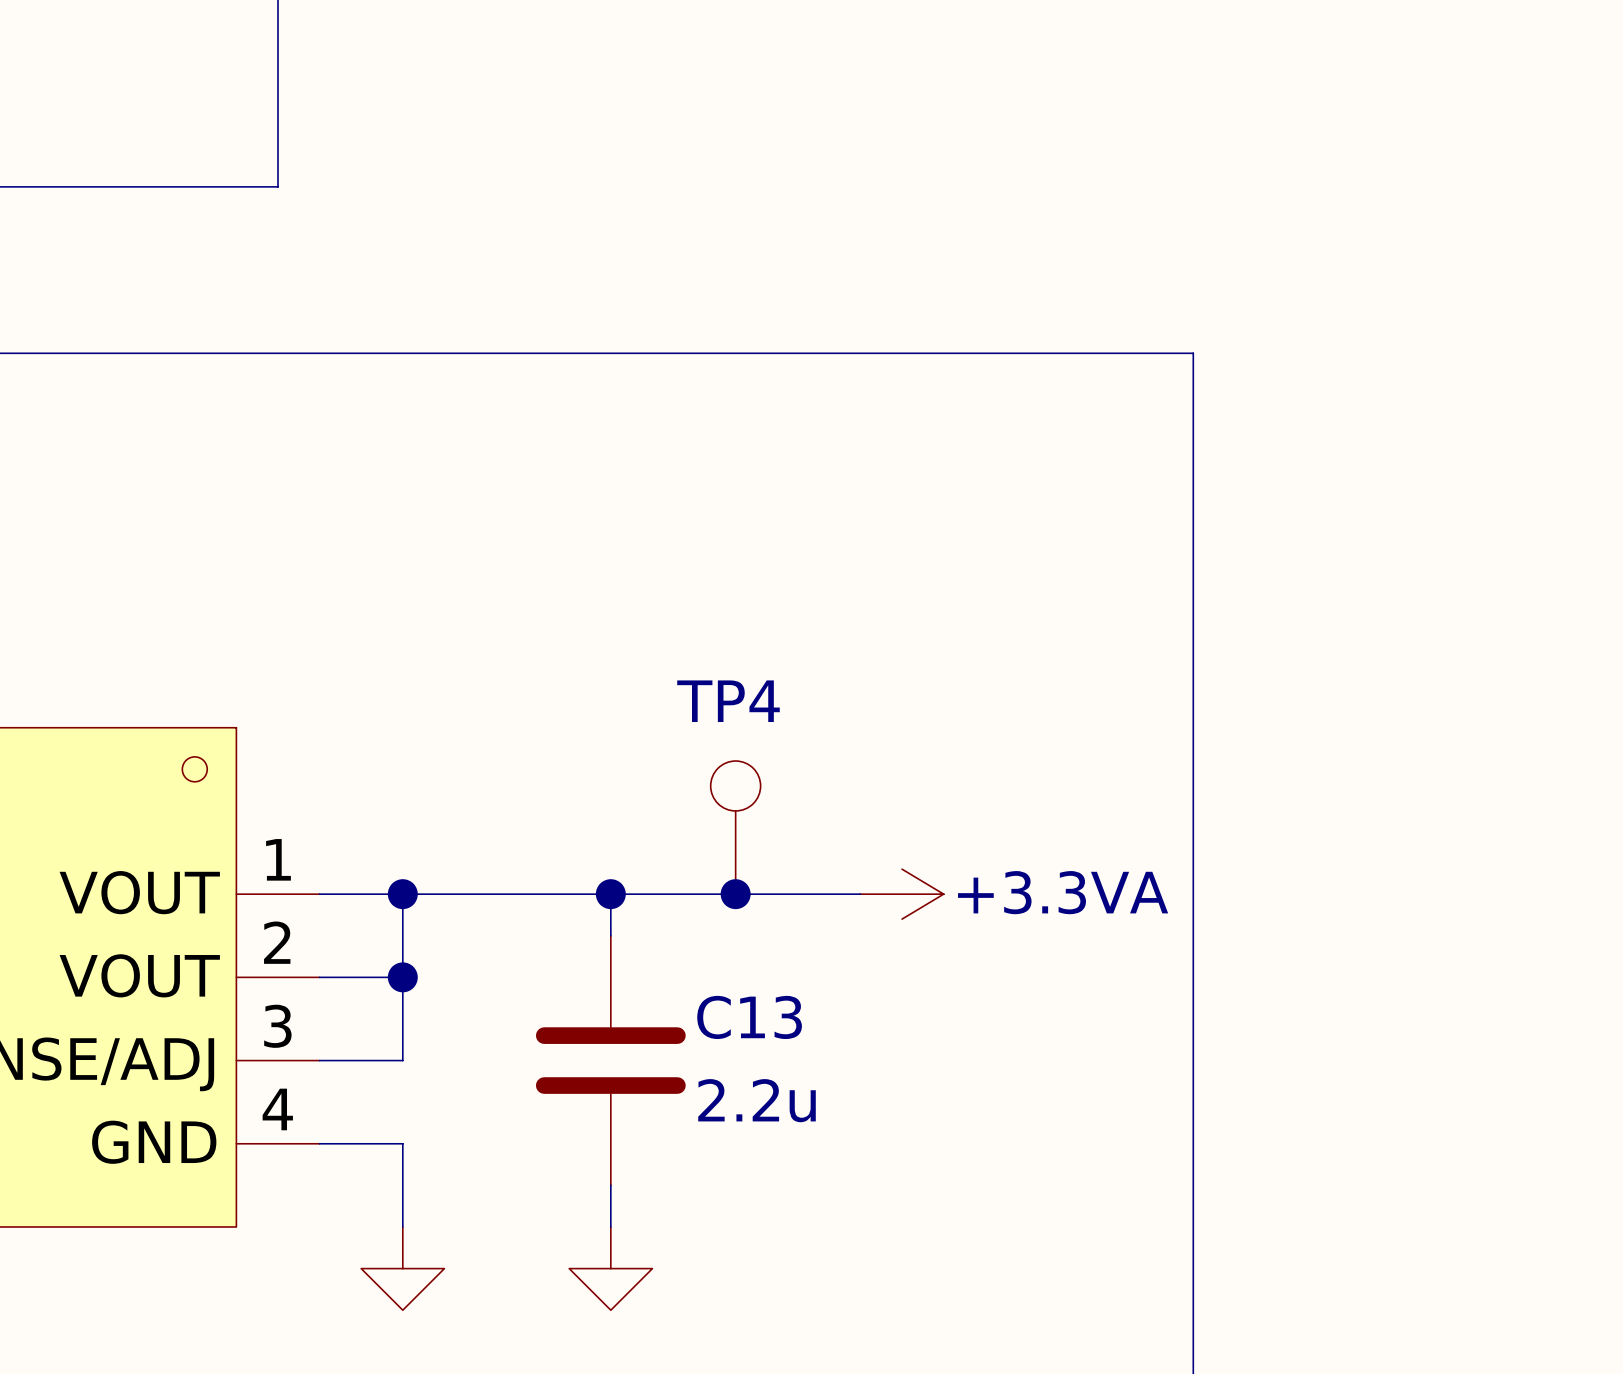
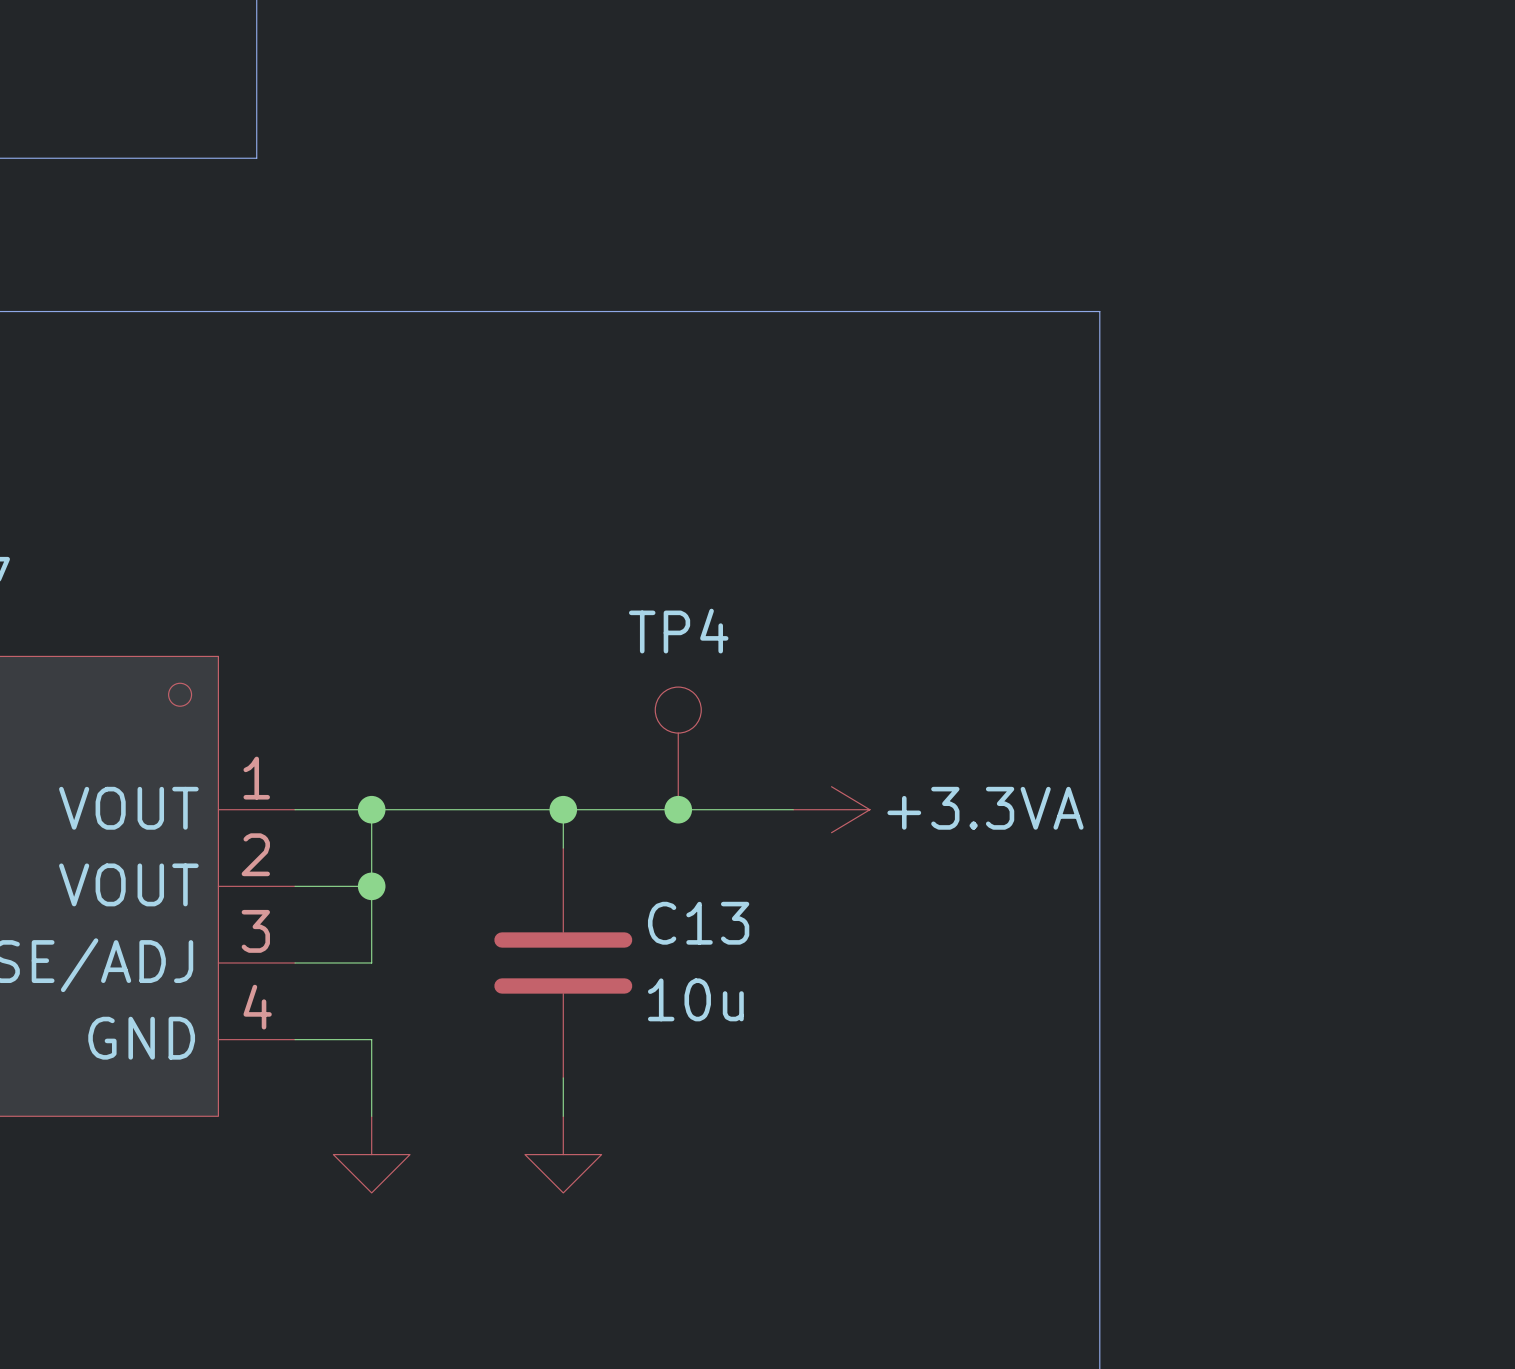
C13 value: 2.2u (757, 1100) -> 10u (695, 999)

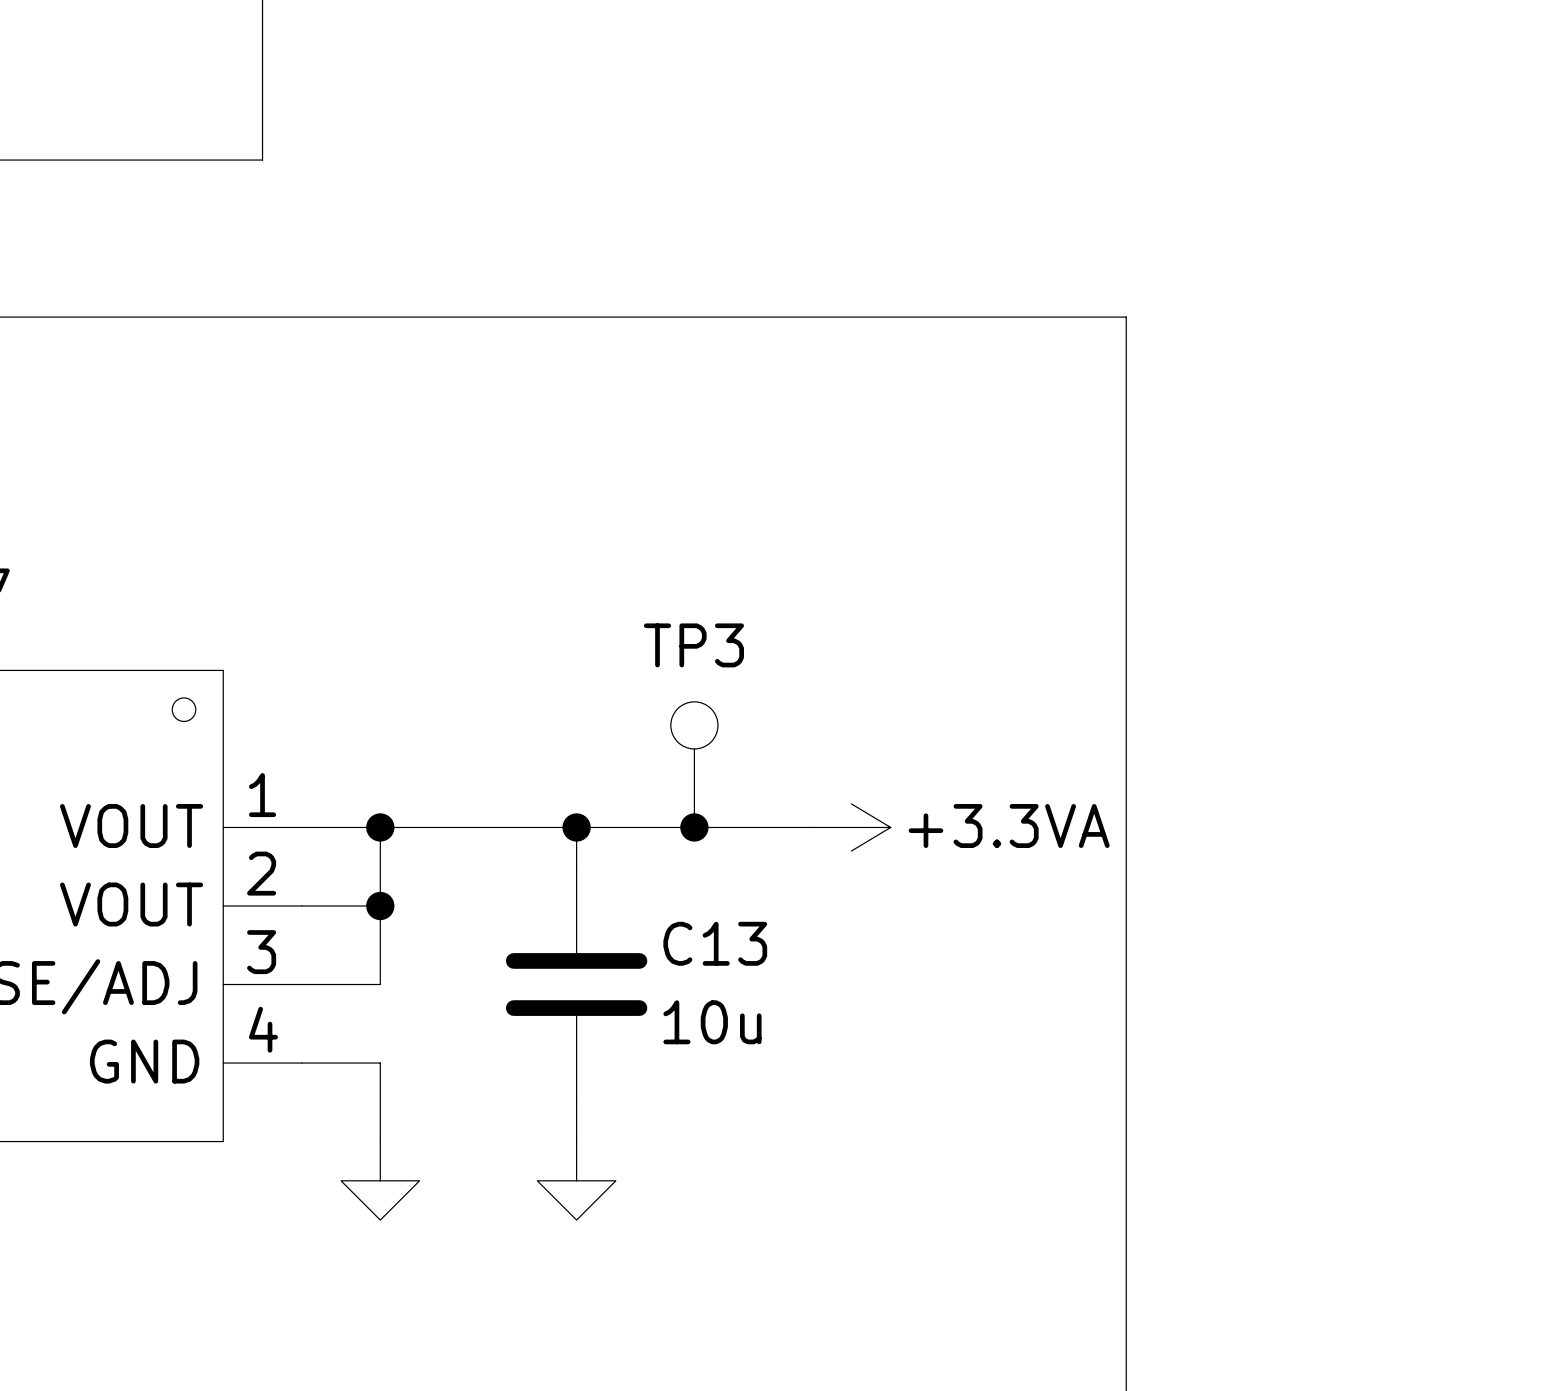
TP4 name: TP4 (678, 631) -> TP3 (693, 645)

